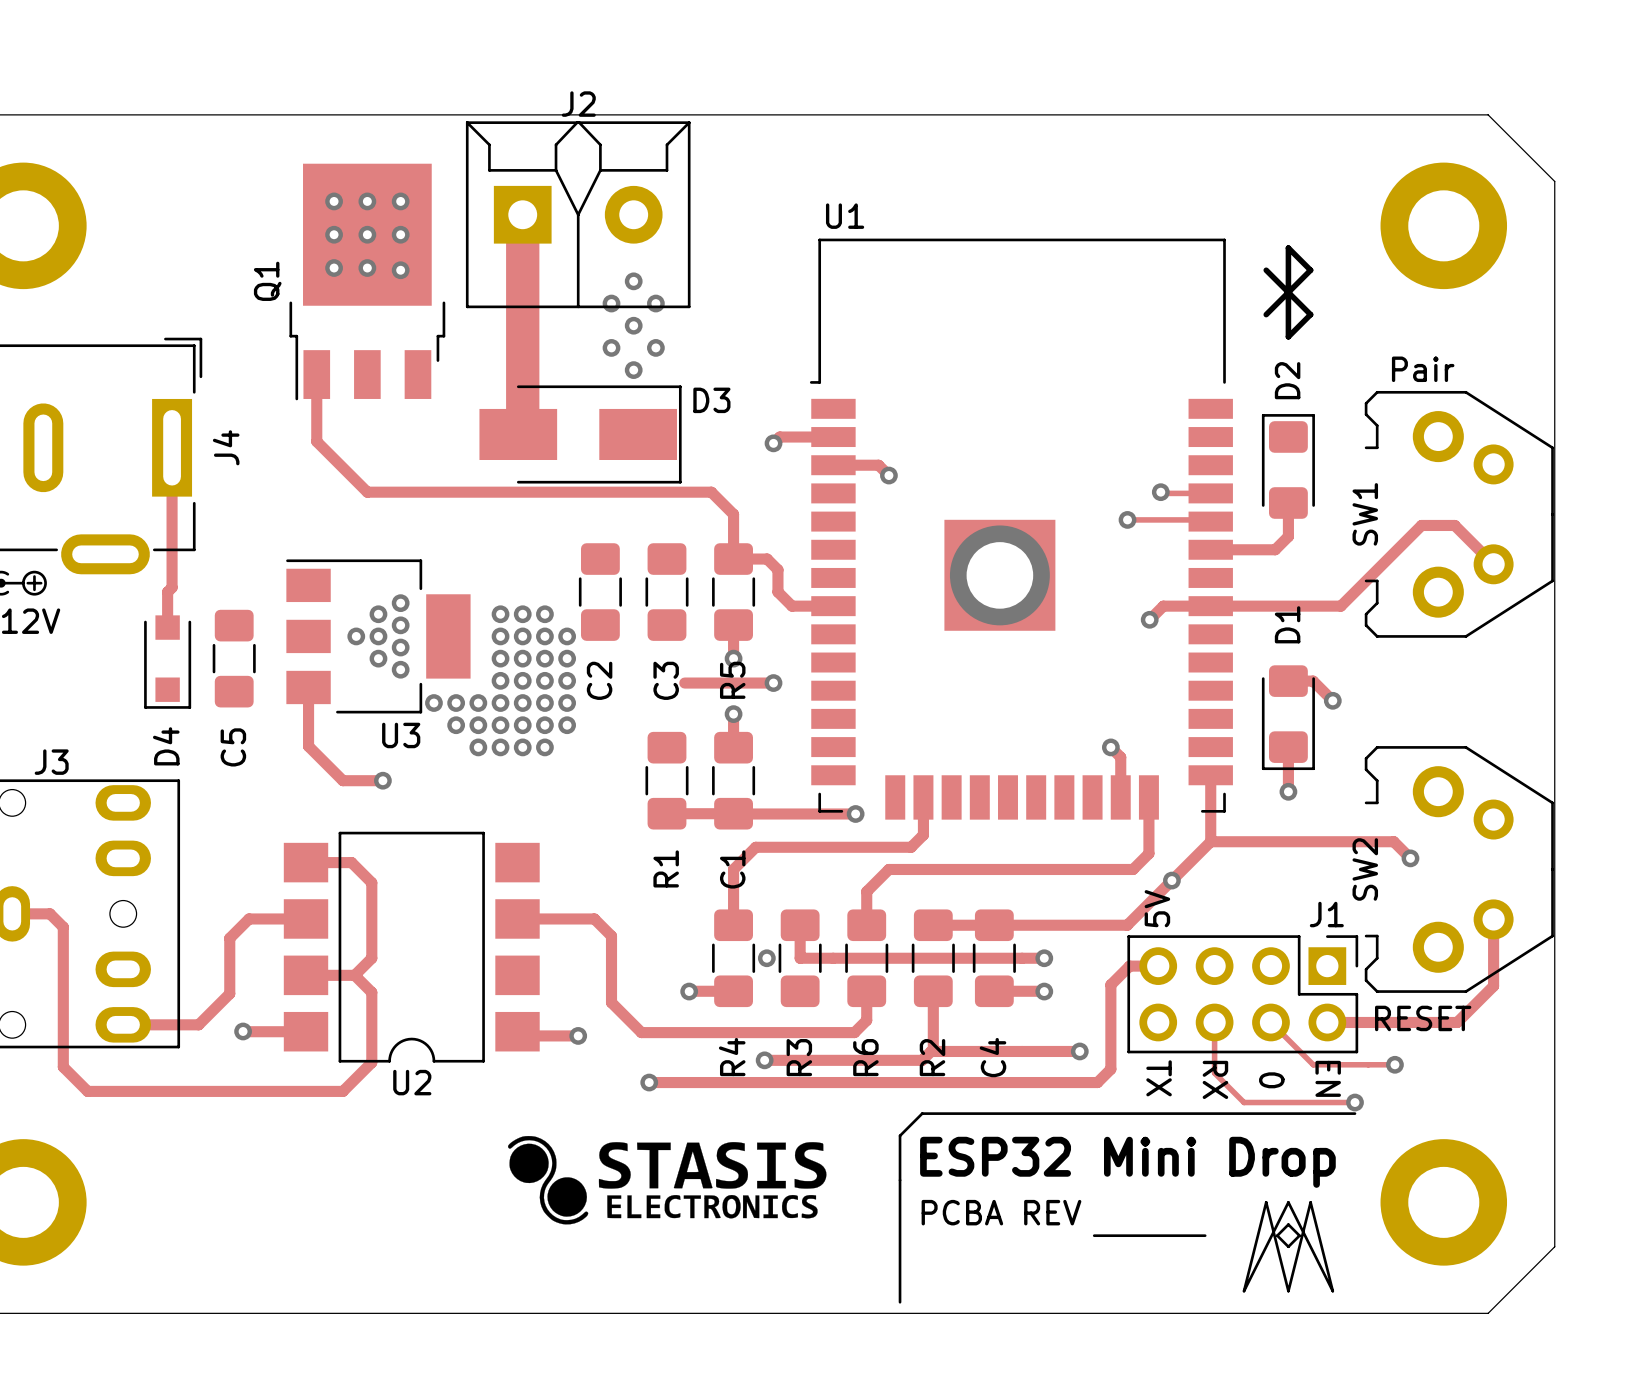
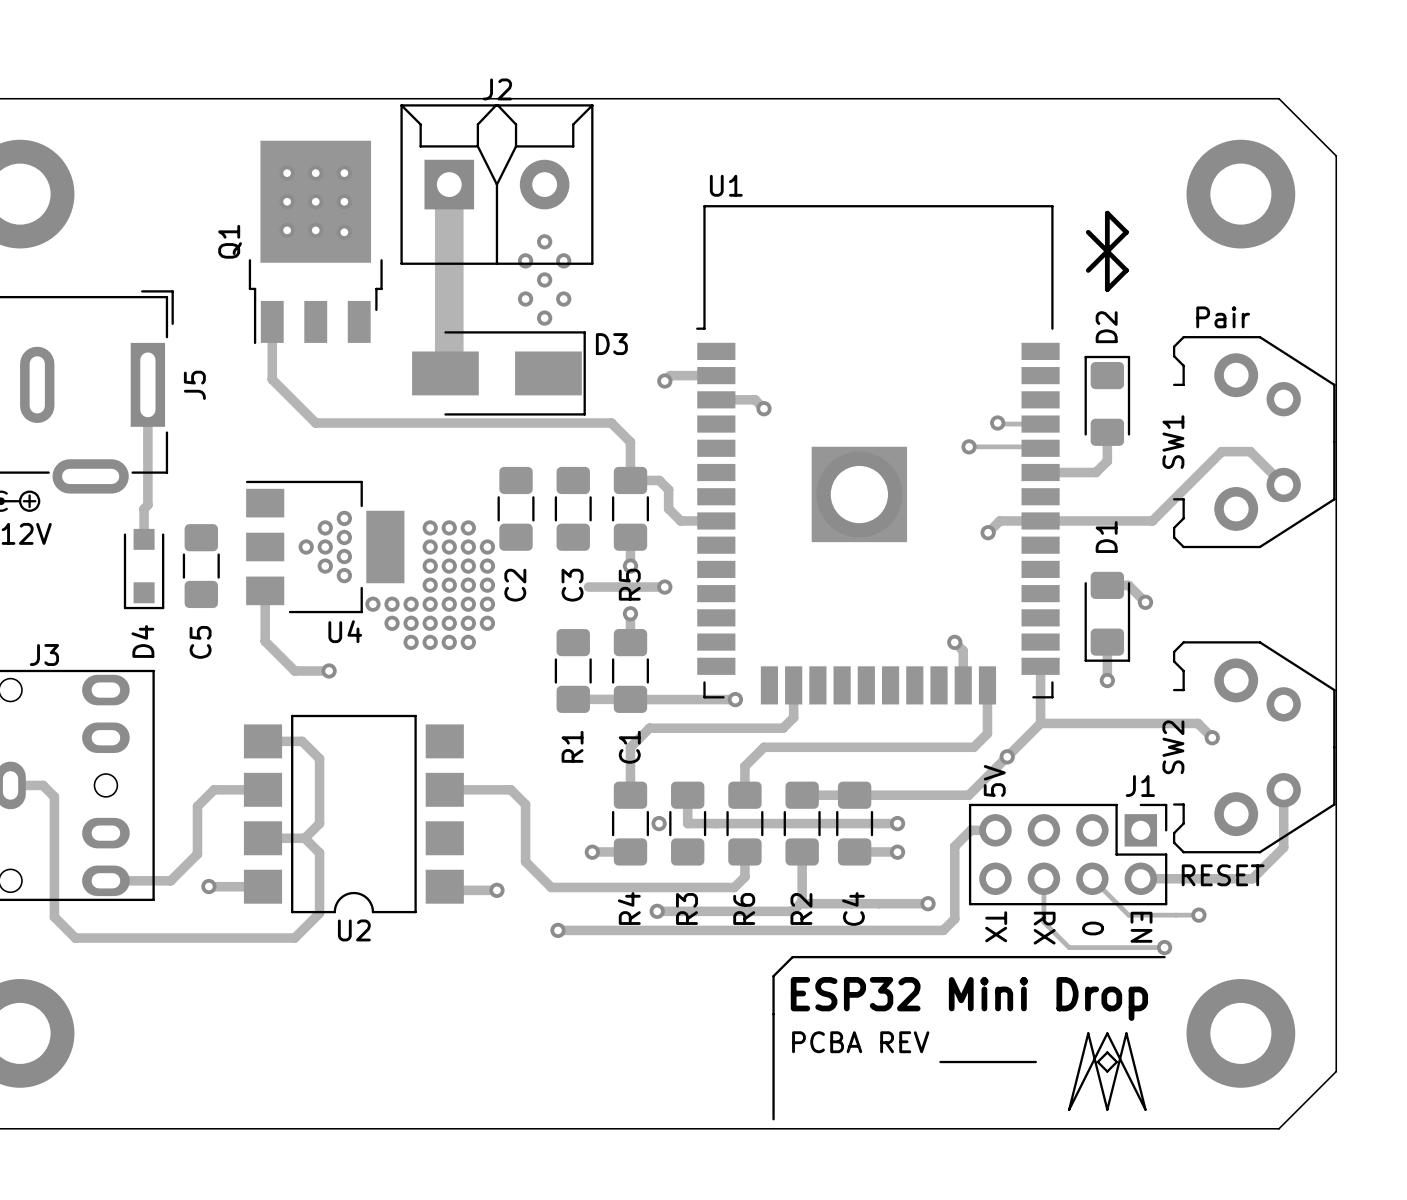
J4 name: J4 (226, 447) -> J5 (194, 385)
U3 name: U3 (401, 735) -> U4 (345, 631)
drawing: [507, 1135, 827, 1225] -> none

